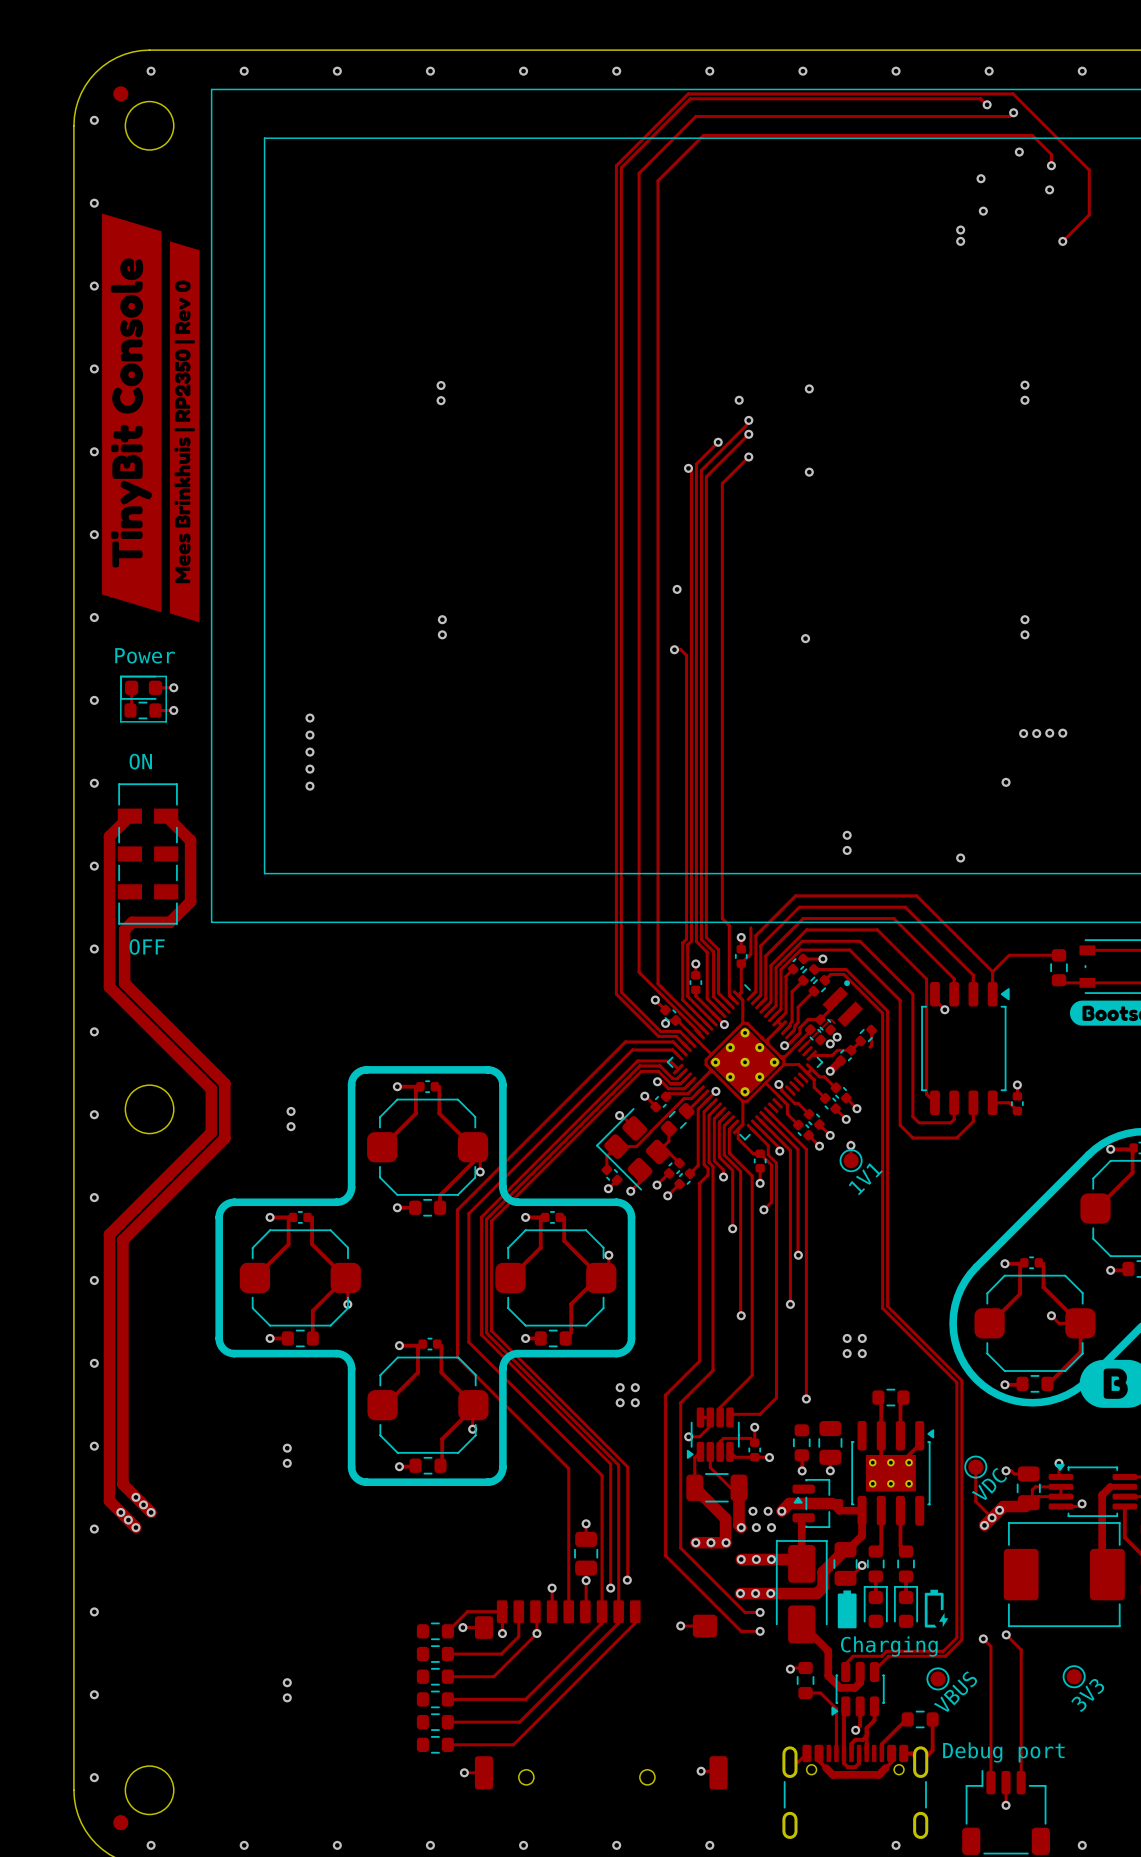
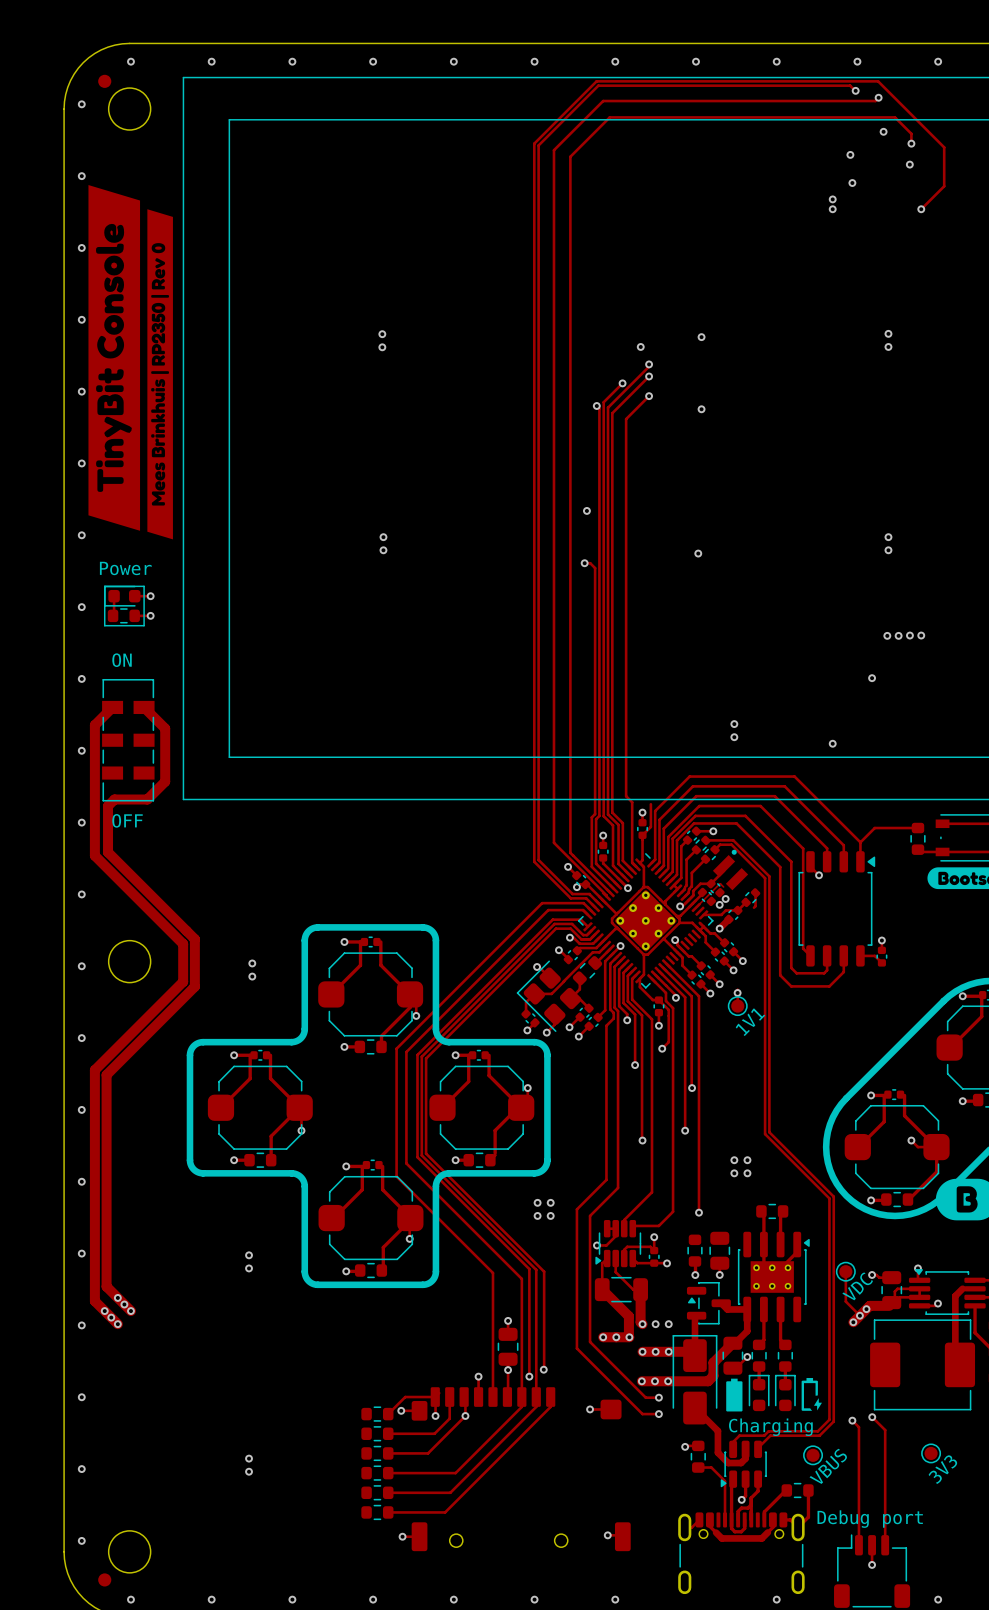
via: (309, 718) -> none
via: (309, 735) -> none
via: (309, 752) -> none
via: (309, 769) -> none
via: (309, 786) -> none
track: (832, 1503) (789, 1503) (781, 1511) -> none
via: (752, 1511) -> none
via: (768, 1511) -> none
via: (781, 1511) -> none

